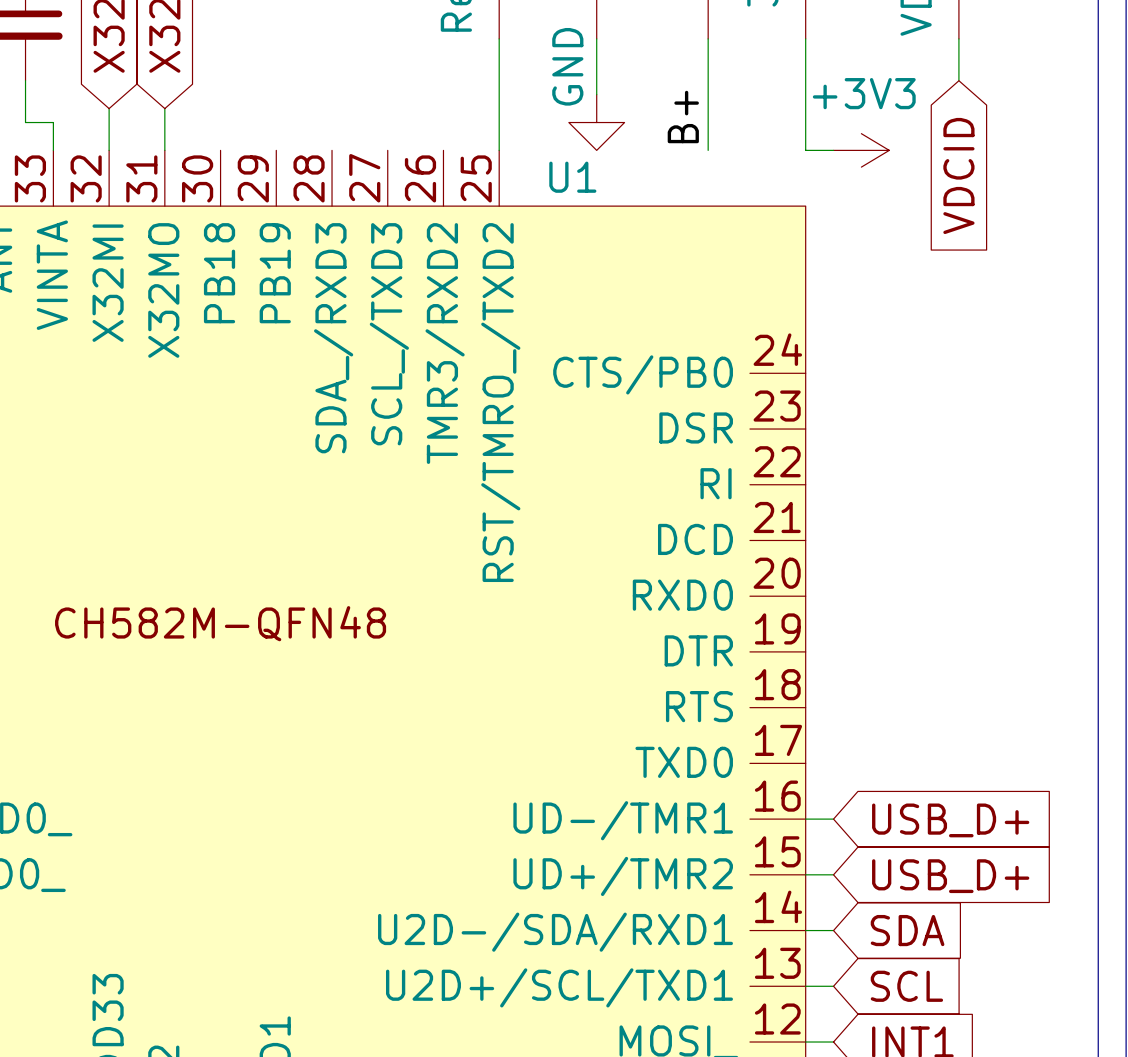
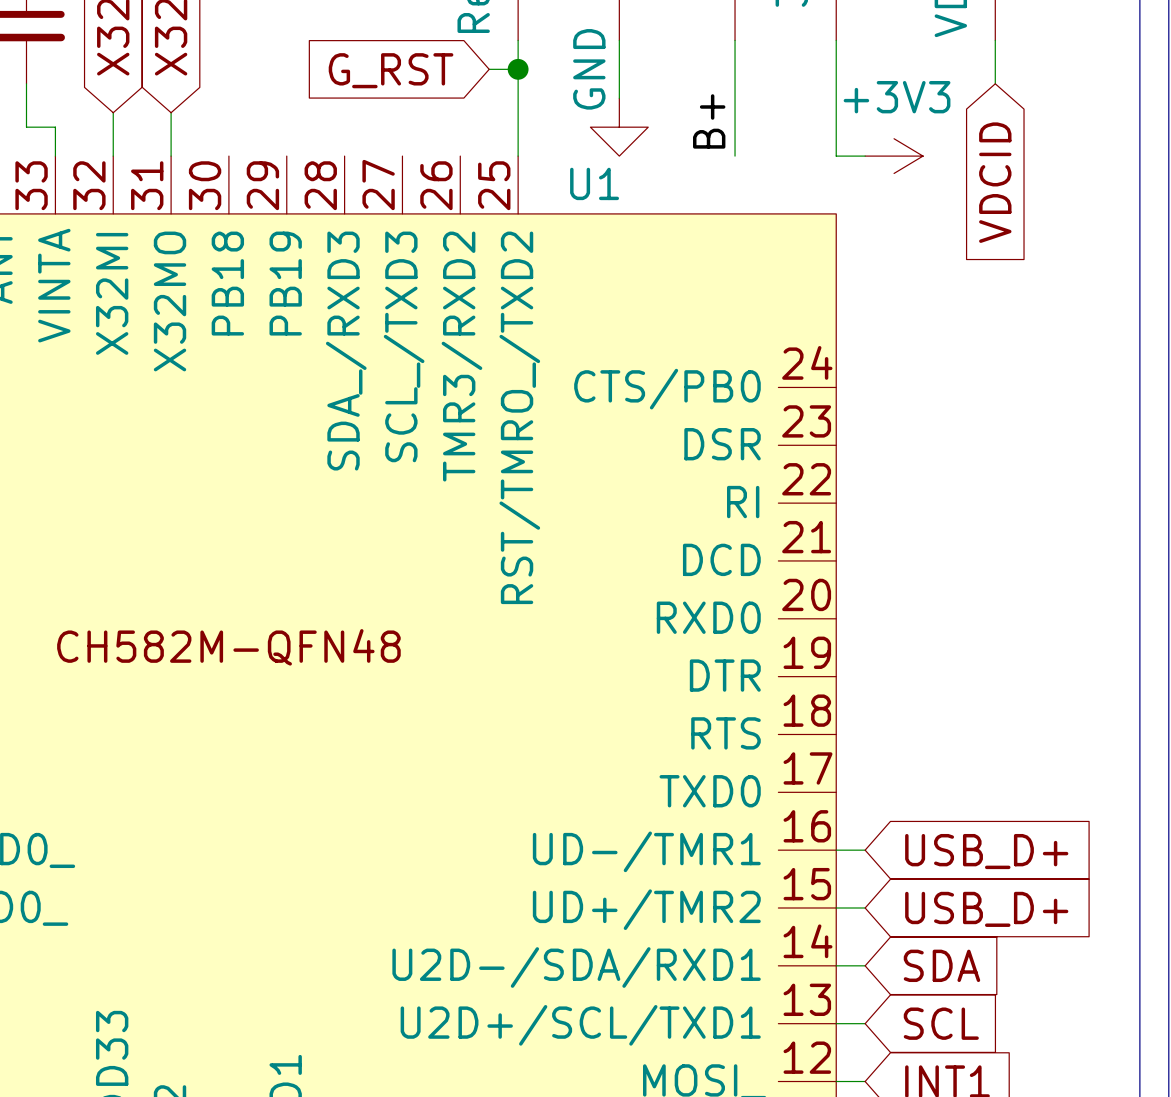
wire: none -> (489, 69) (518, 69)
junction: none -> (518, 69)
global label: none -> G_RST (391, 70)

